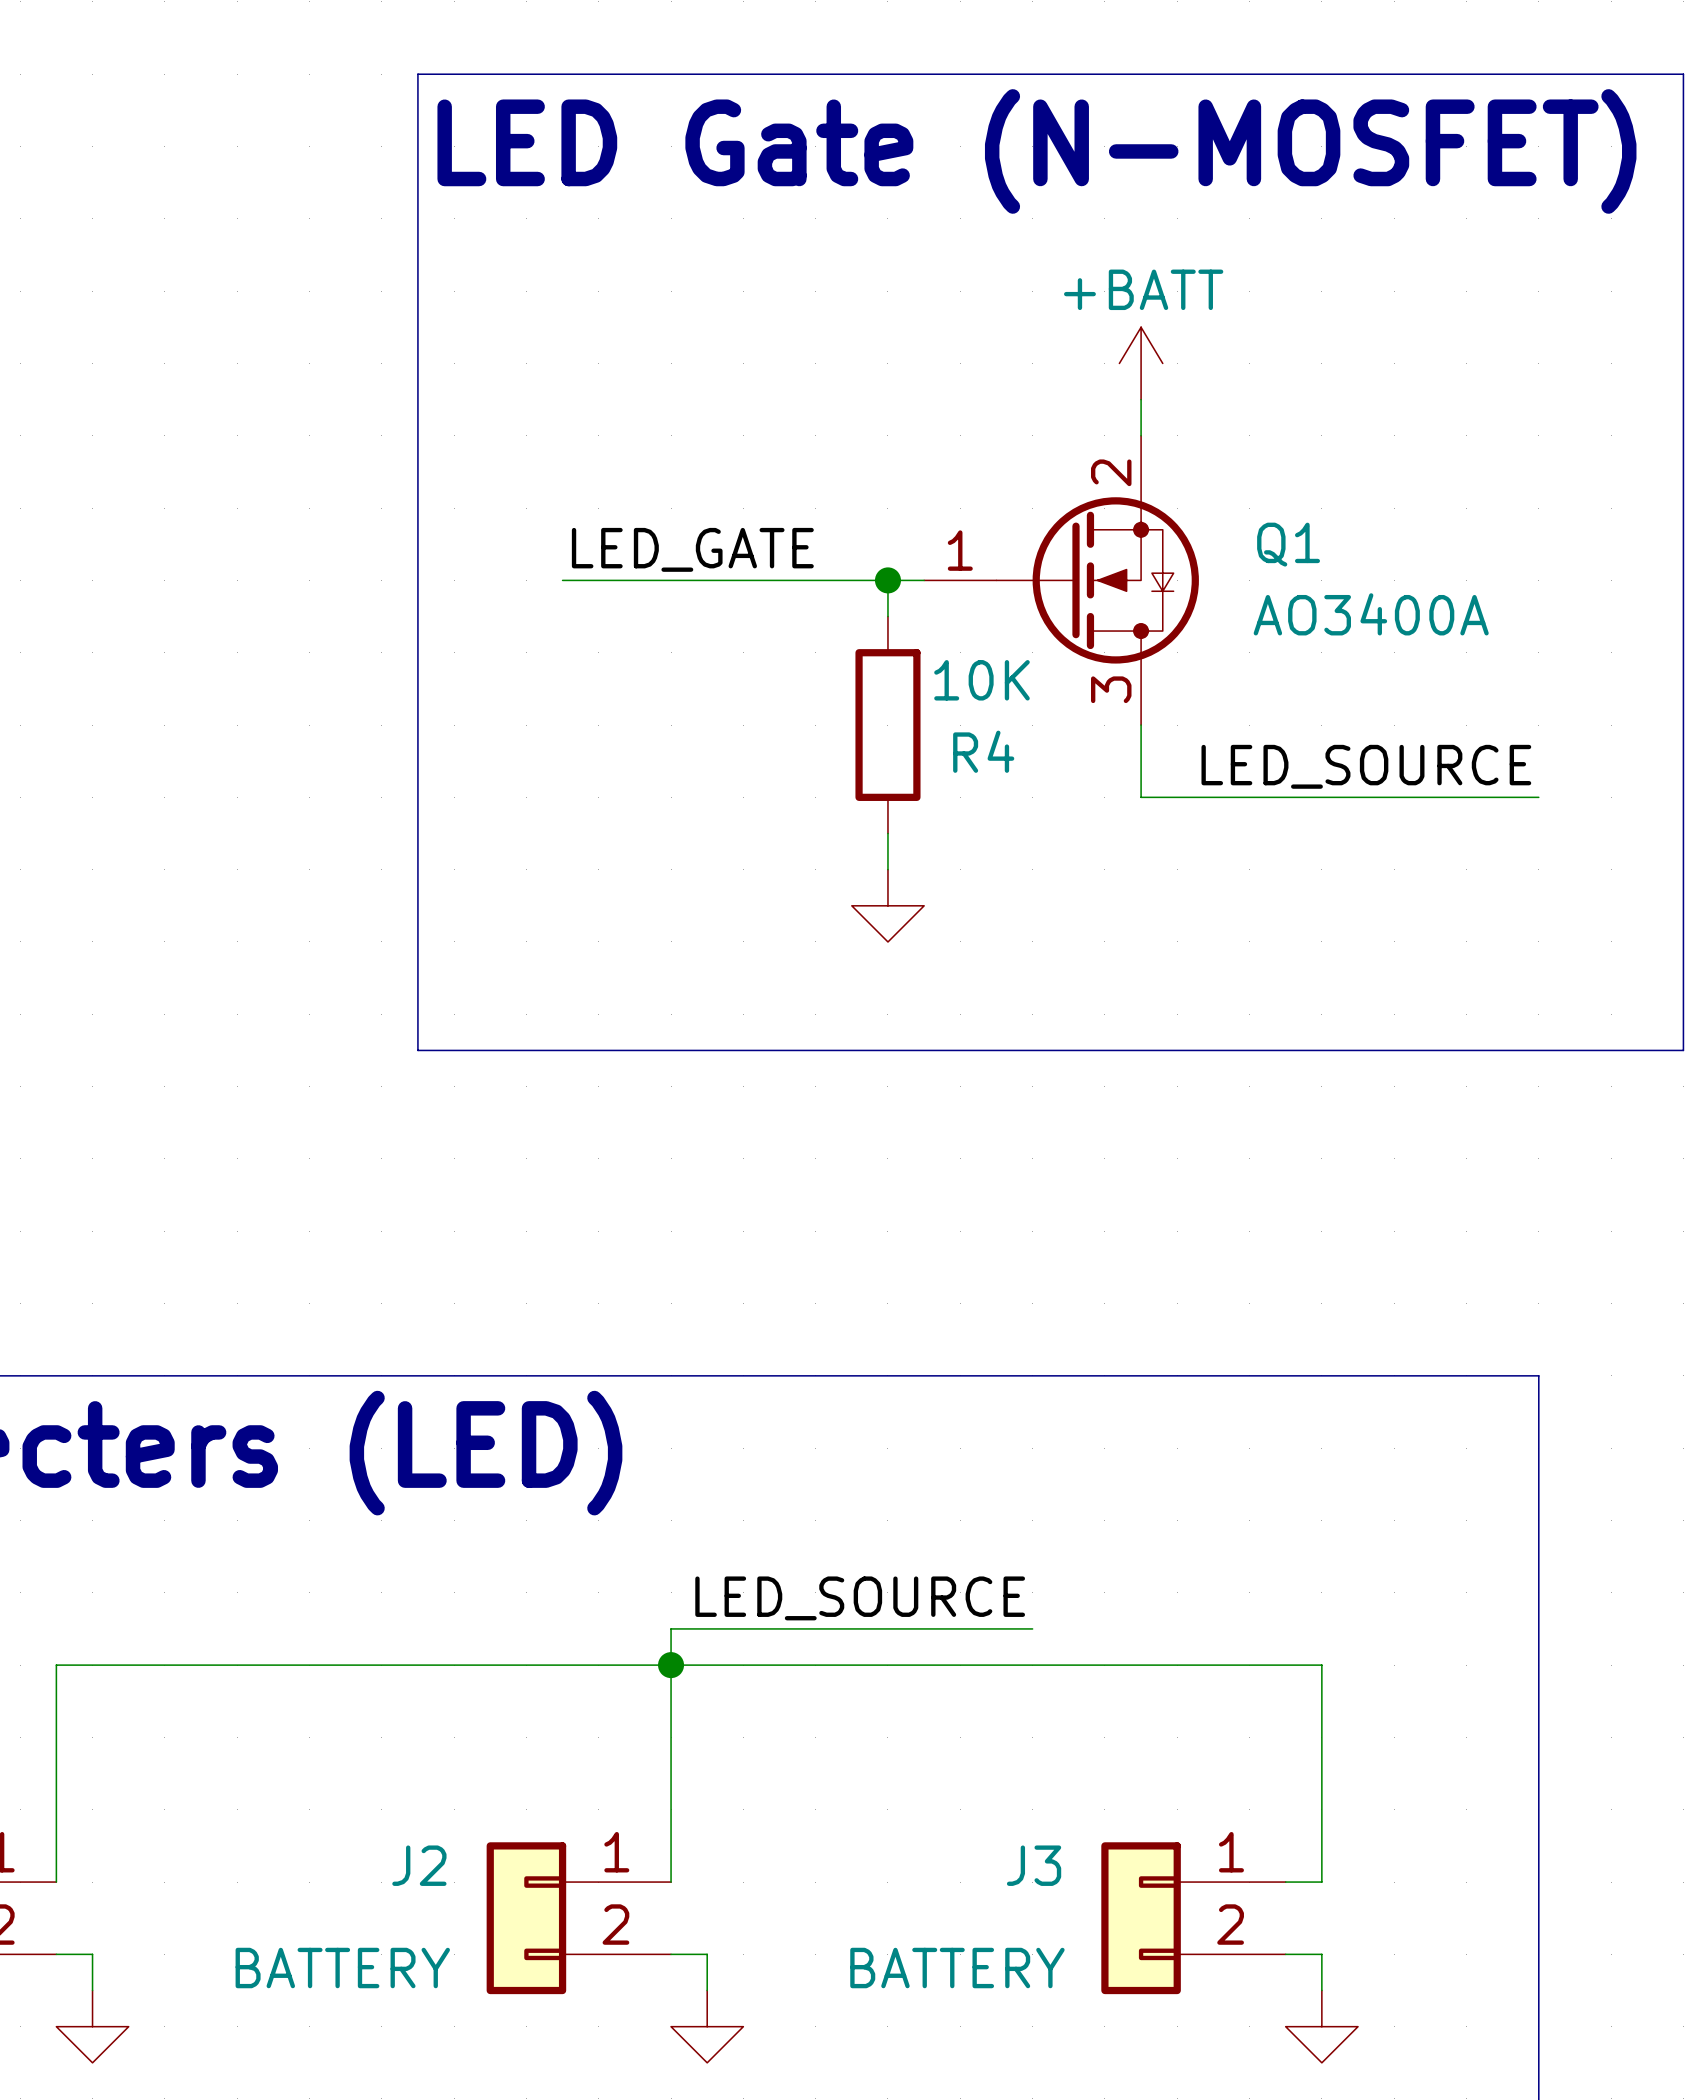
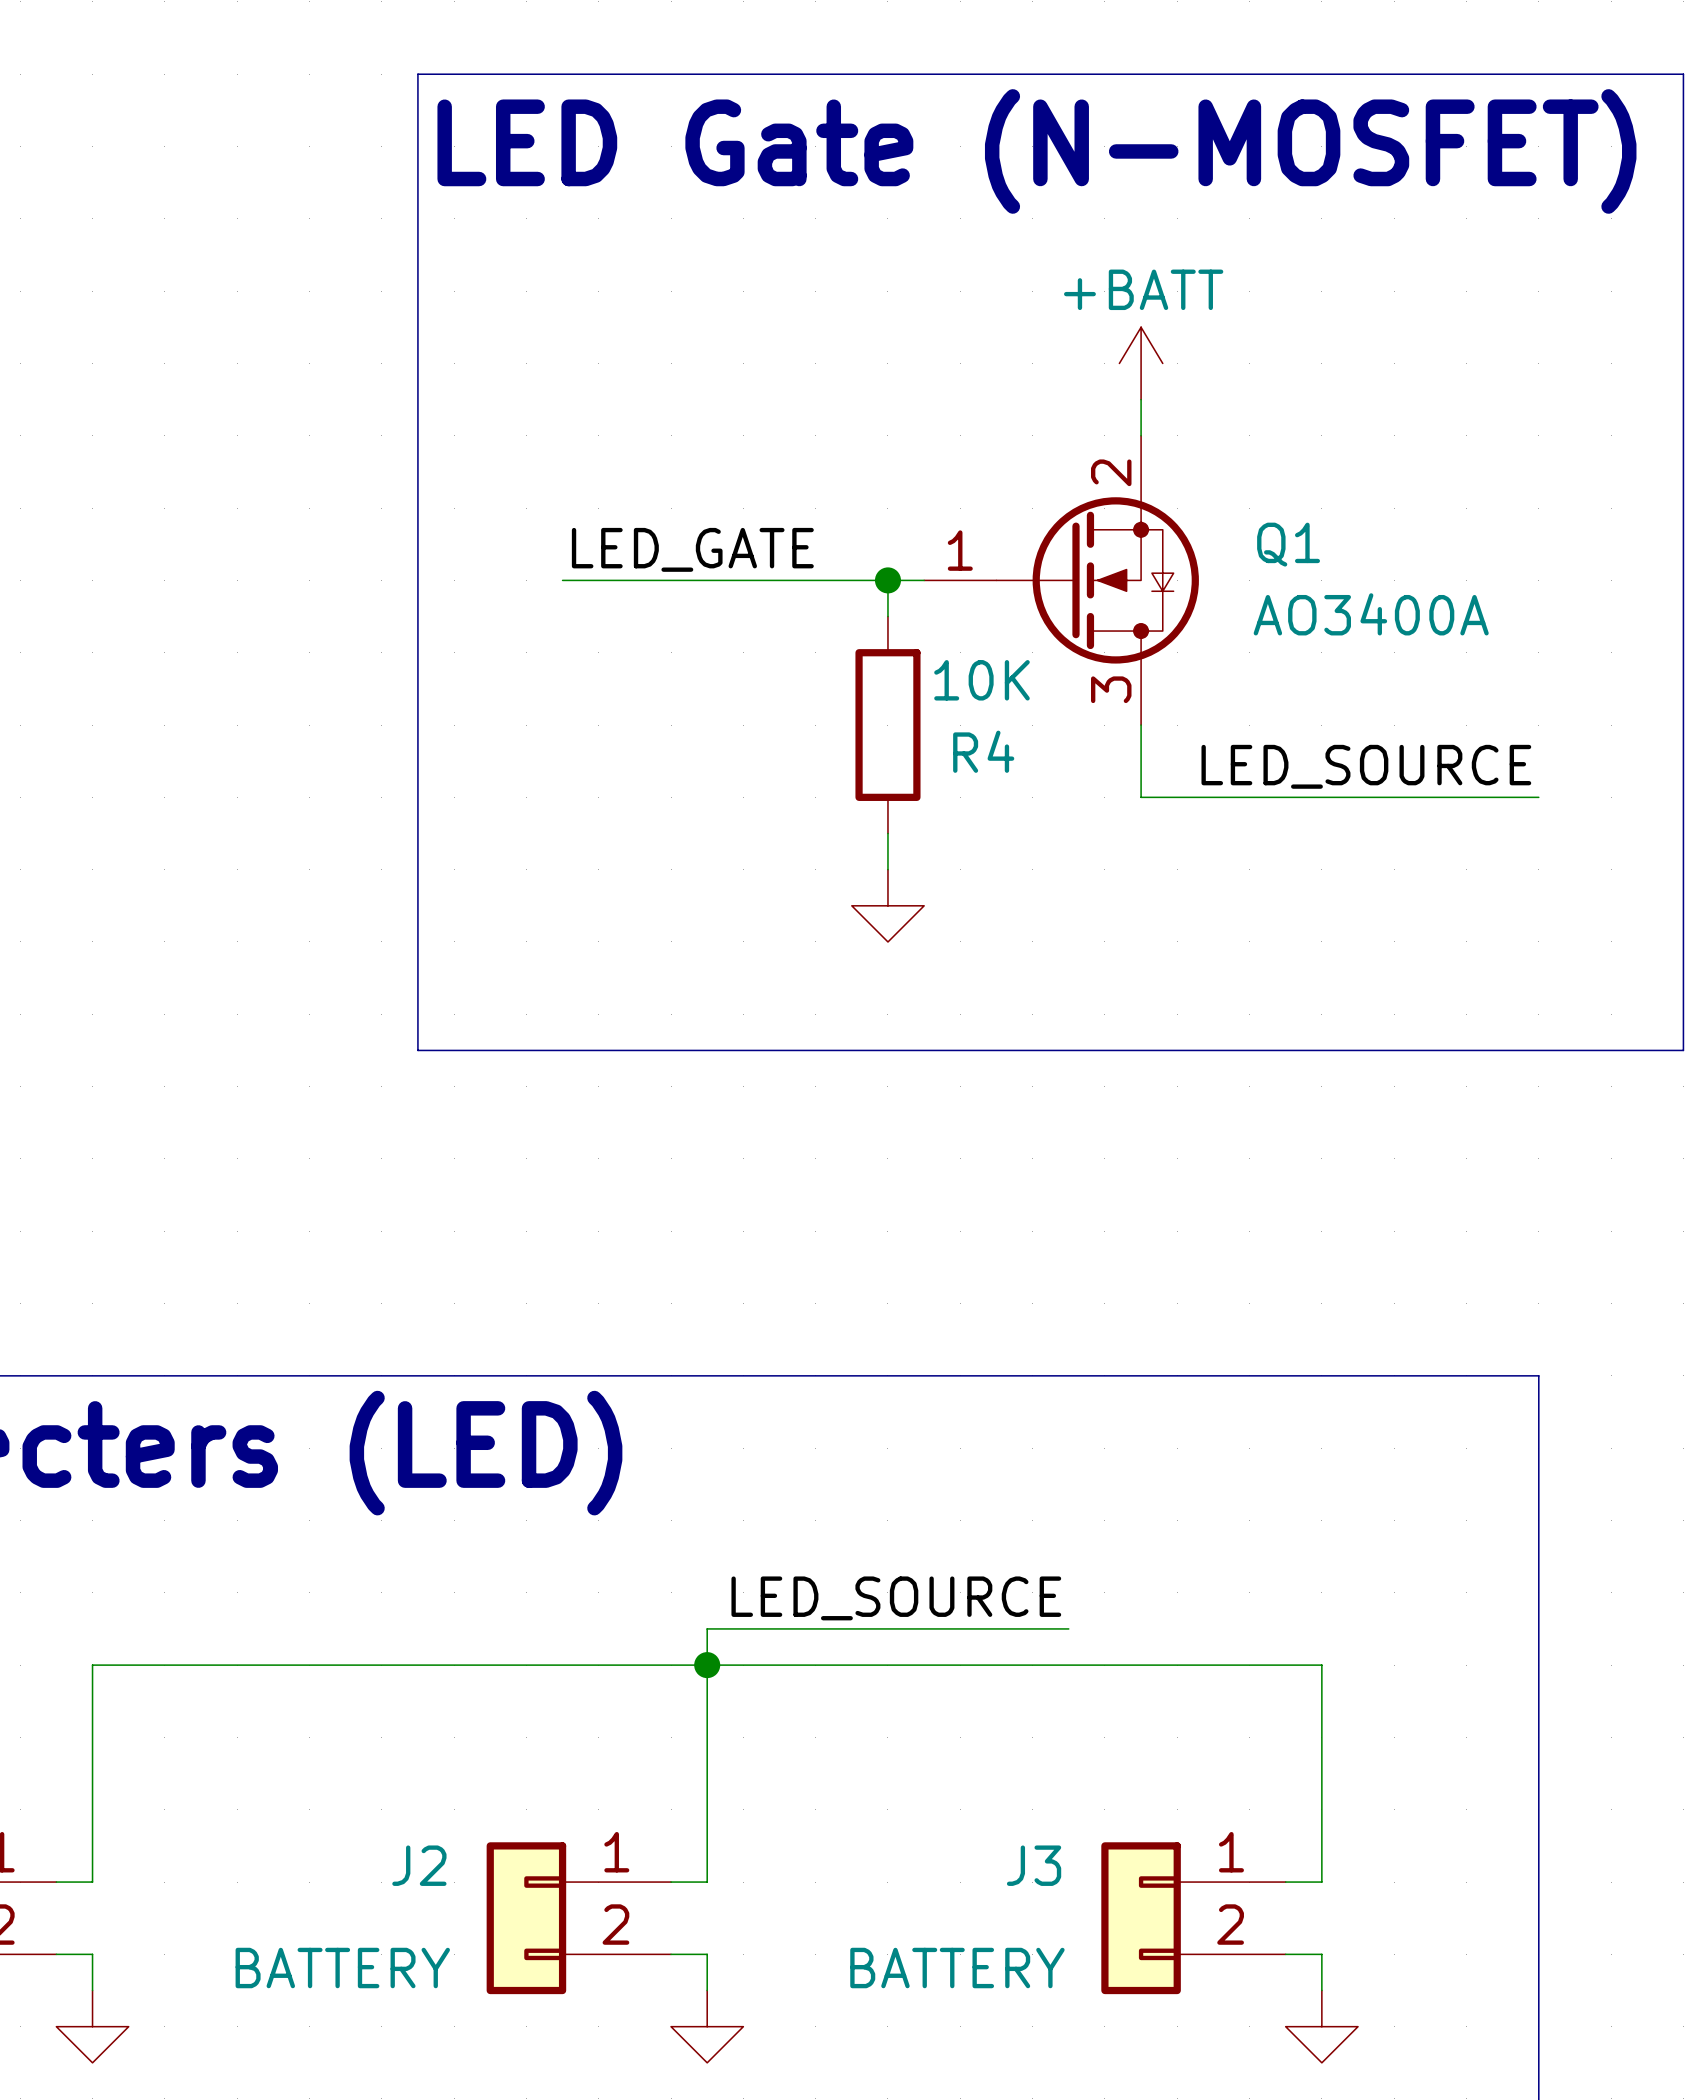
label position: LED_SOURCE (860, 1598) -> LED_SOURCE (896, 1598)
wire: (707, 1628) (671, 1628) (671, 1882) -> (707, 1628) (707, 1882) (671, 1882)
wire: none -> (1032, 1628) (1068, 1628)
wire: (92, 1665) (56, 1665) (56, 1882) -> (92, 1665) (92, 1882) (56, 1882)
junction position: (671, 1665) -> (707, 1665)

